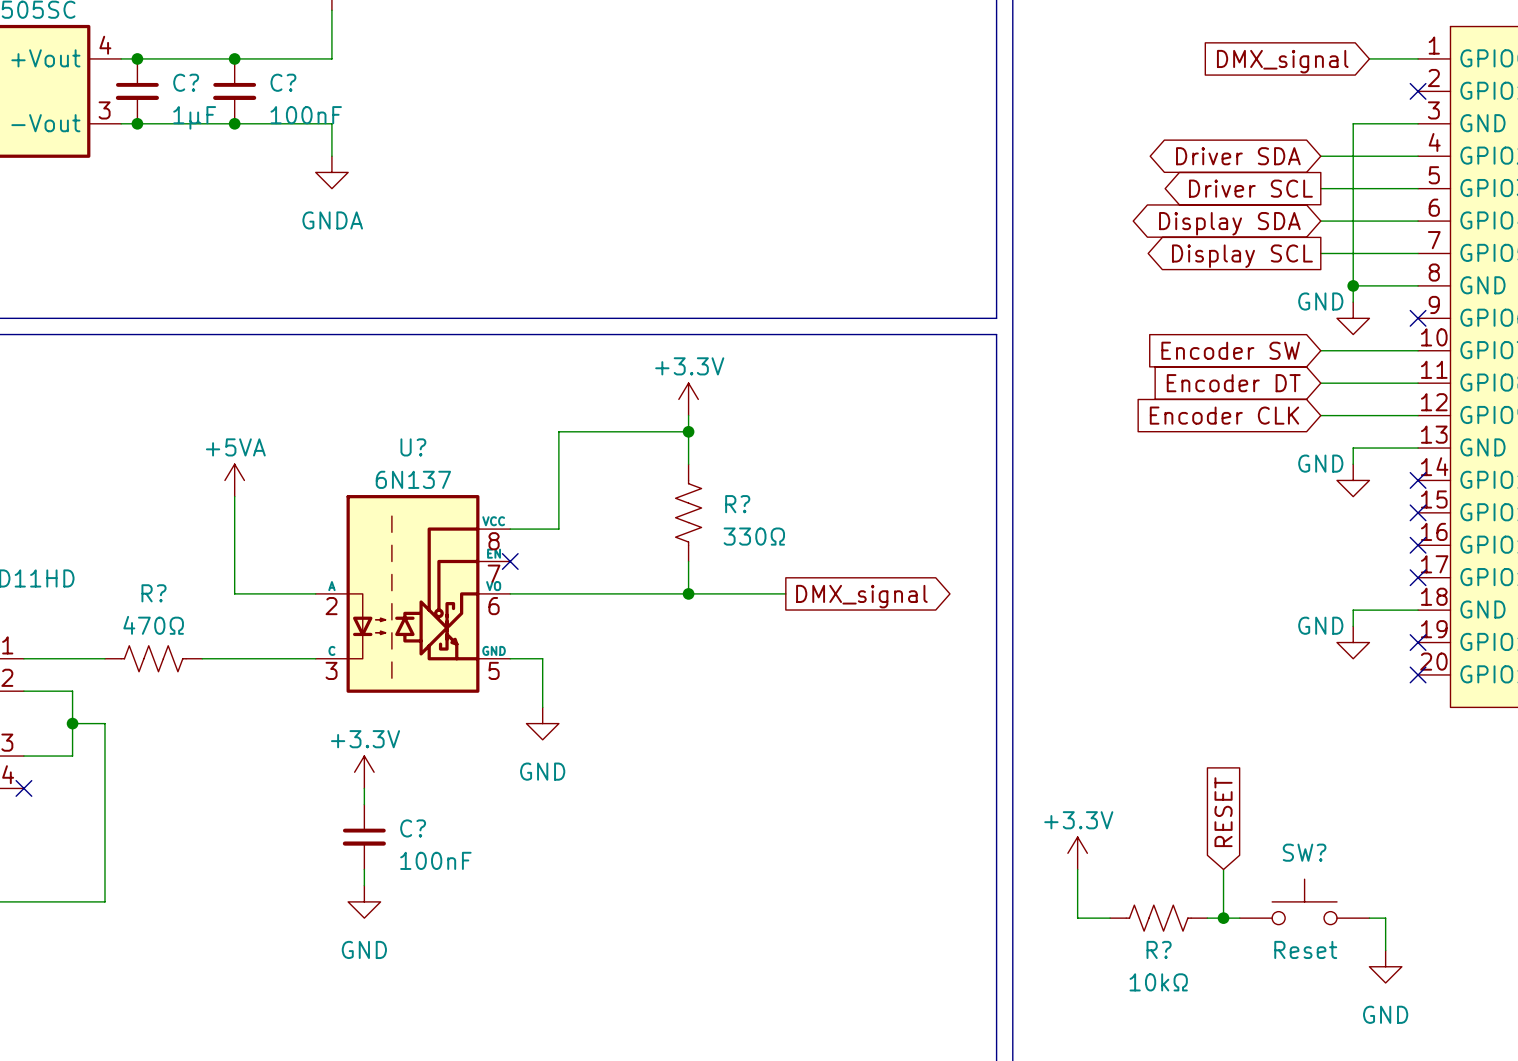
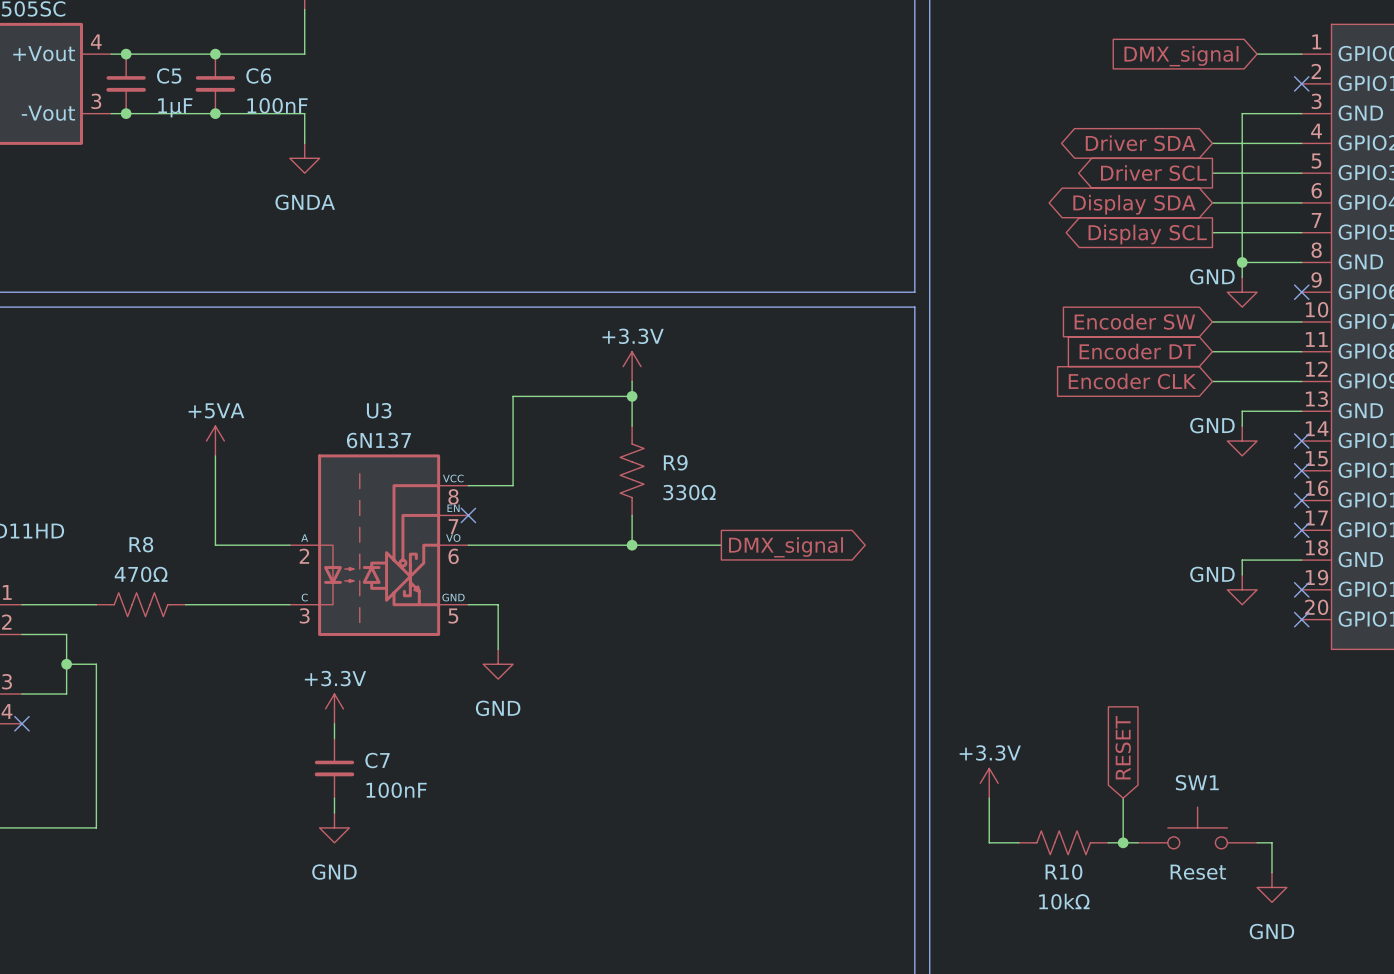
C? name: C? (186, 82) -> C5 (169, 75)
C? name: C? (283, 82) -> C6 (258, 75)
U? name: U? (413, 447) -> U3 (379, 410)
R? name: R? (737, 504) -> R9 (675, 462)
R? name: R? (154, 593) -> R8 (141, 544)
C? name: C? (413, 828) -> C7 (377, 760)
SW? name: SW? (1304, 852) -> SW1 (1197, 782)
R? name: R? (1159, 949) -> R10 (1063, 872)

